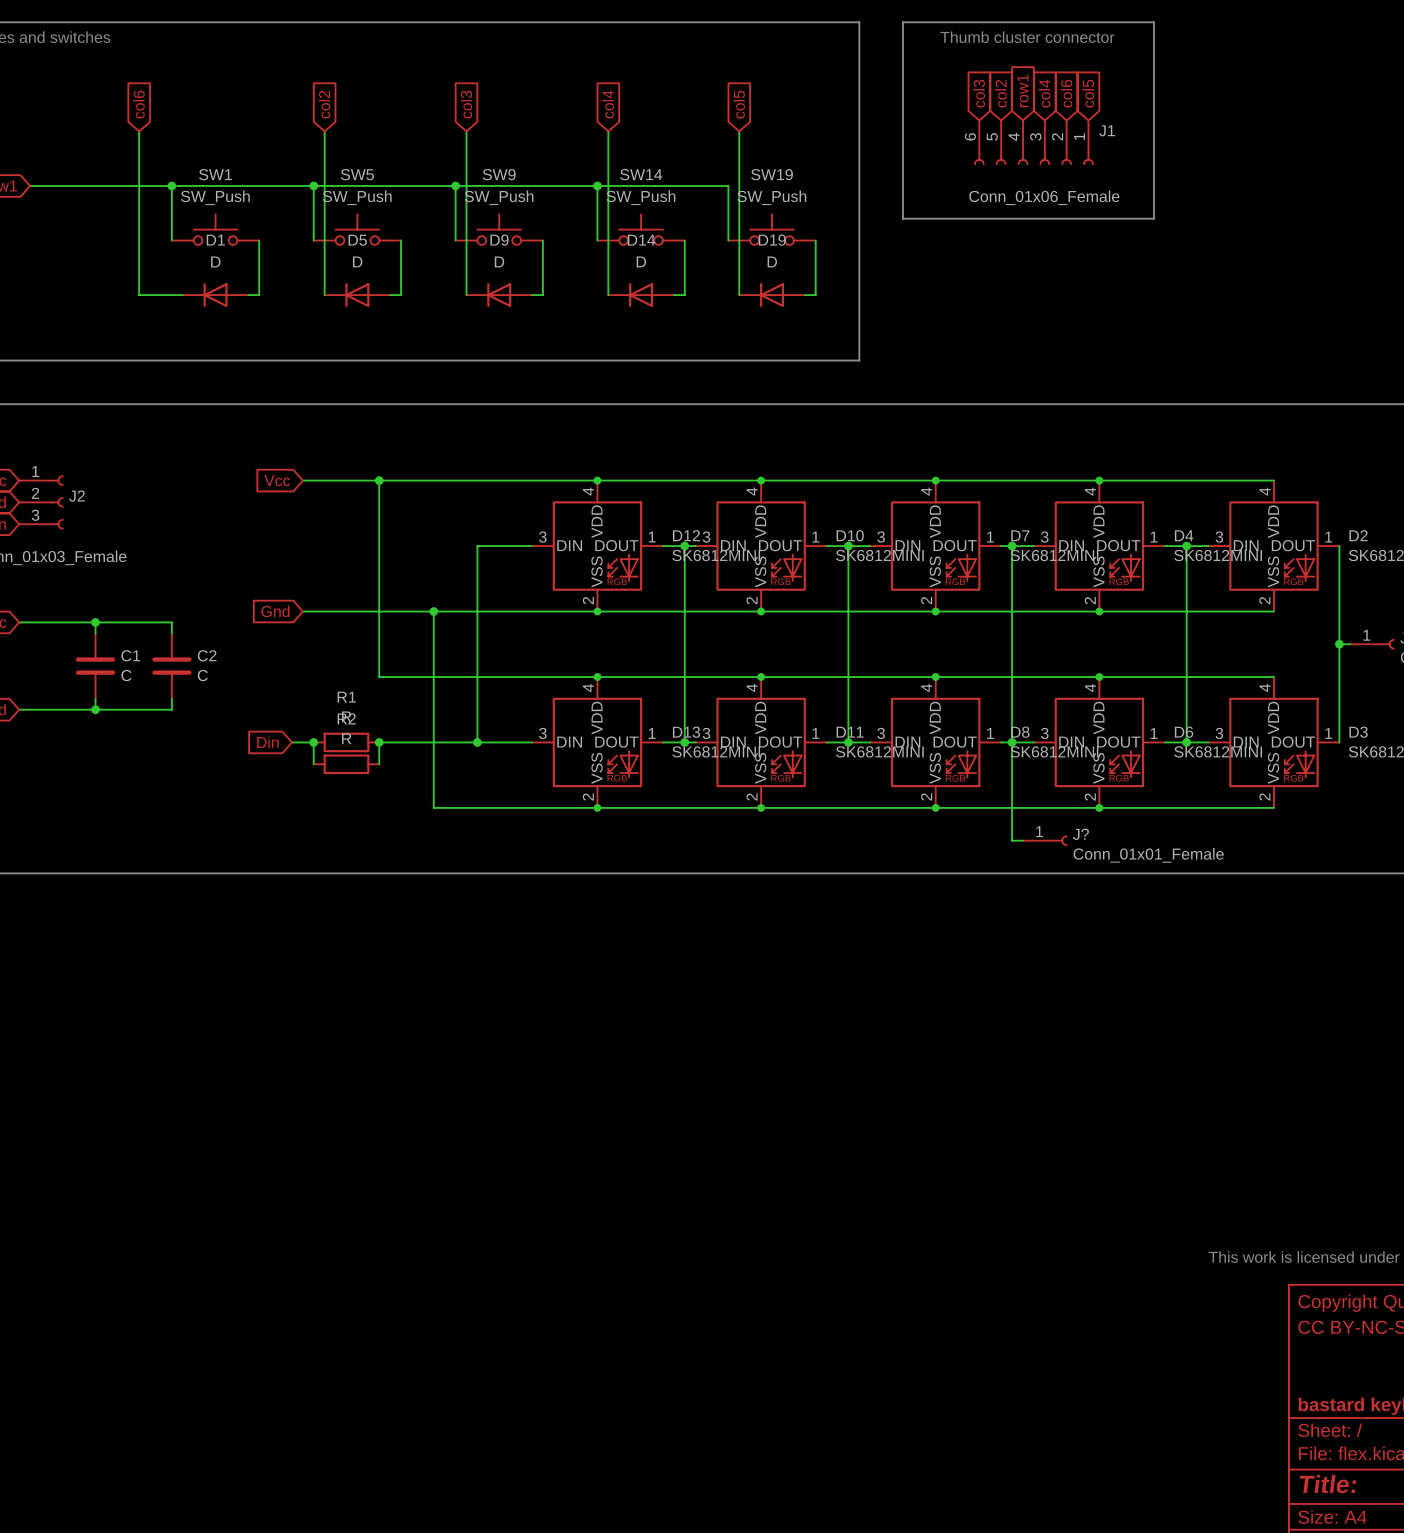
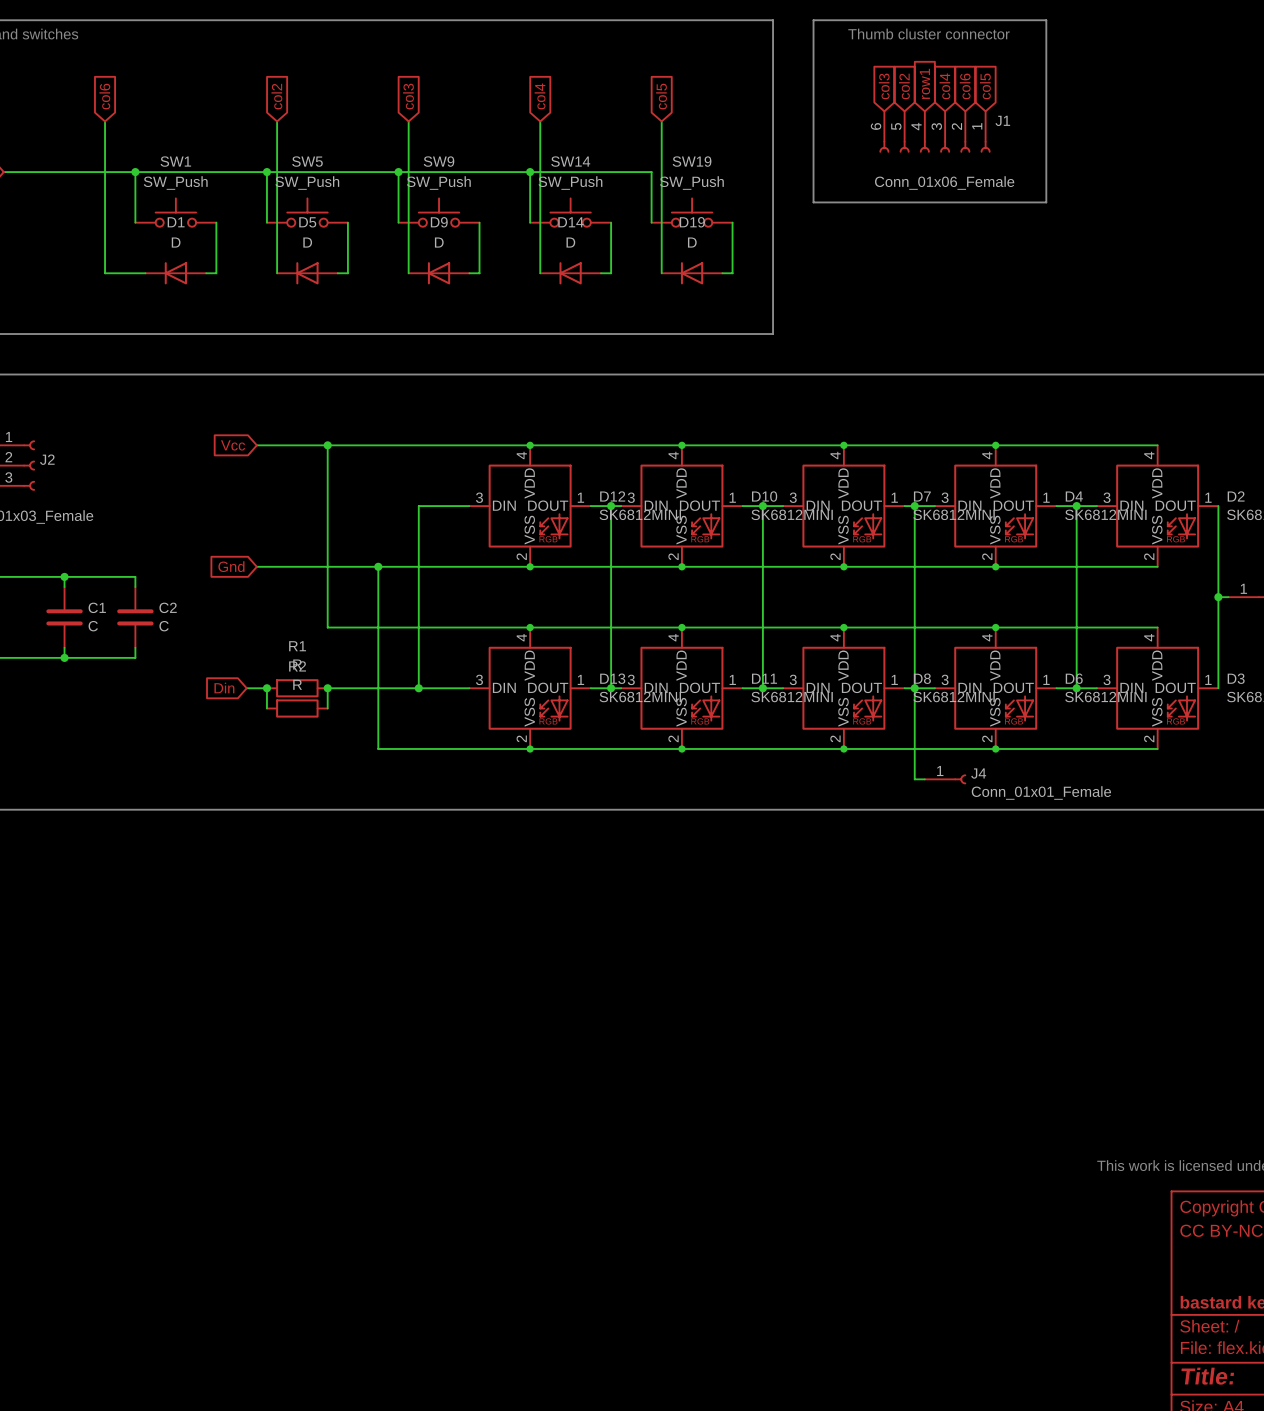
J? name: J? (1080, 834) -> J4 (978, 773)

